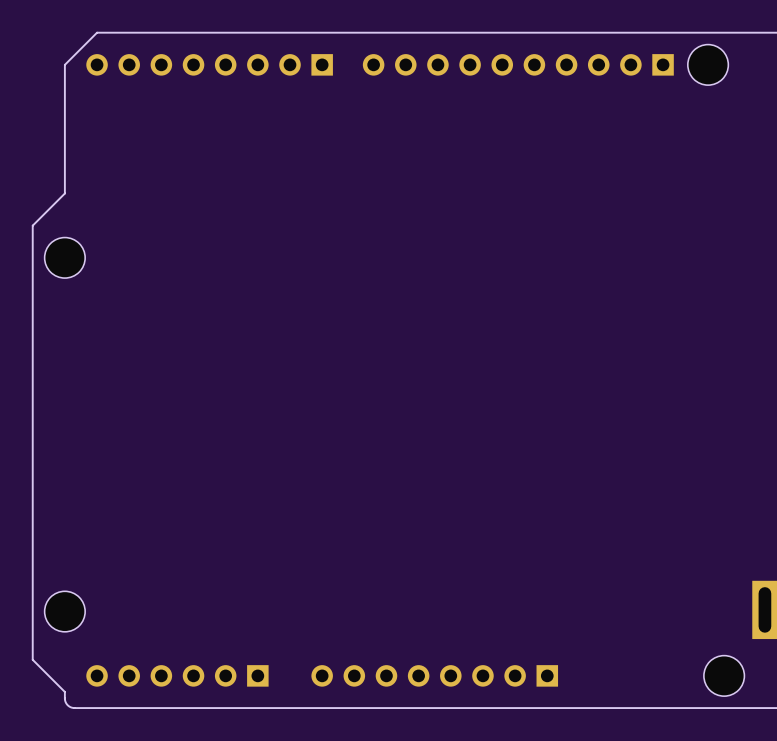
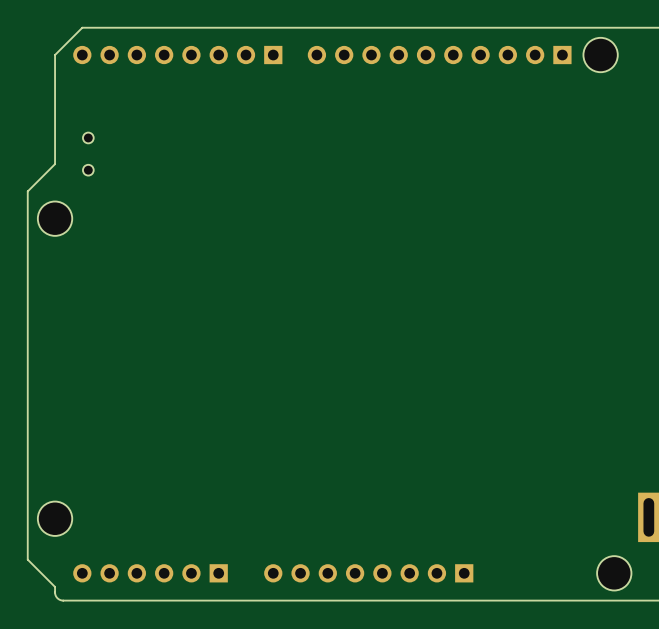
part: none -> (88, 154)

